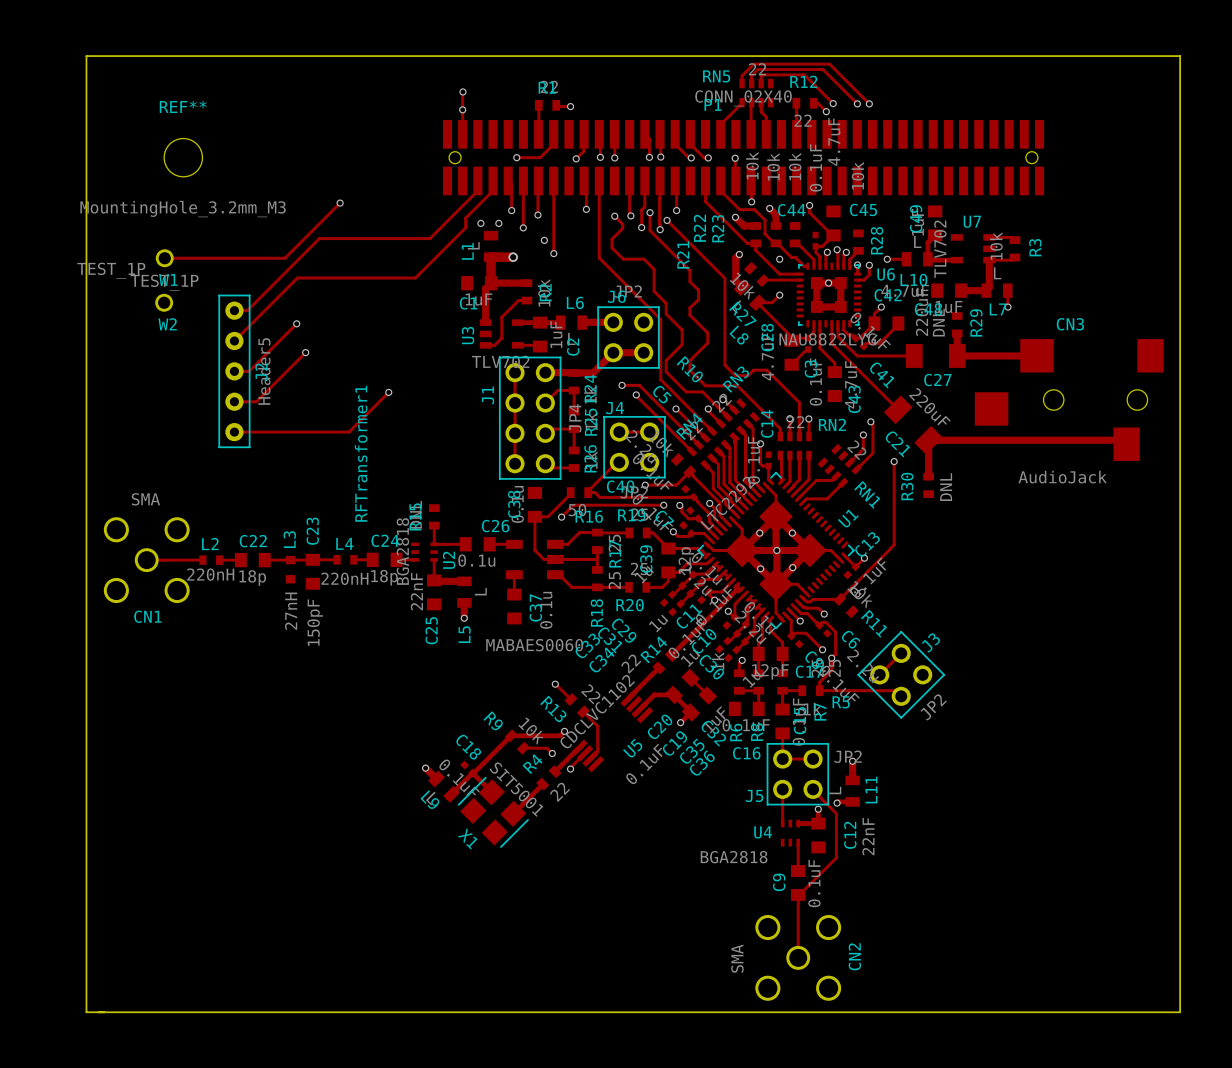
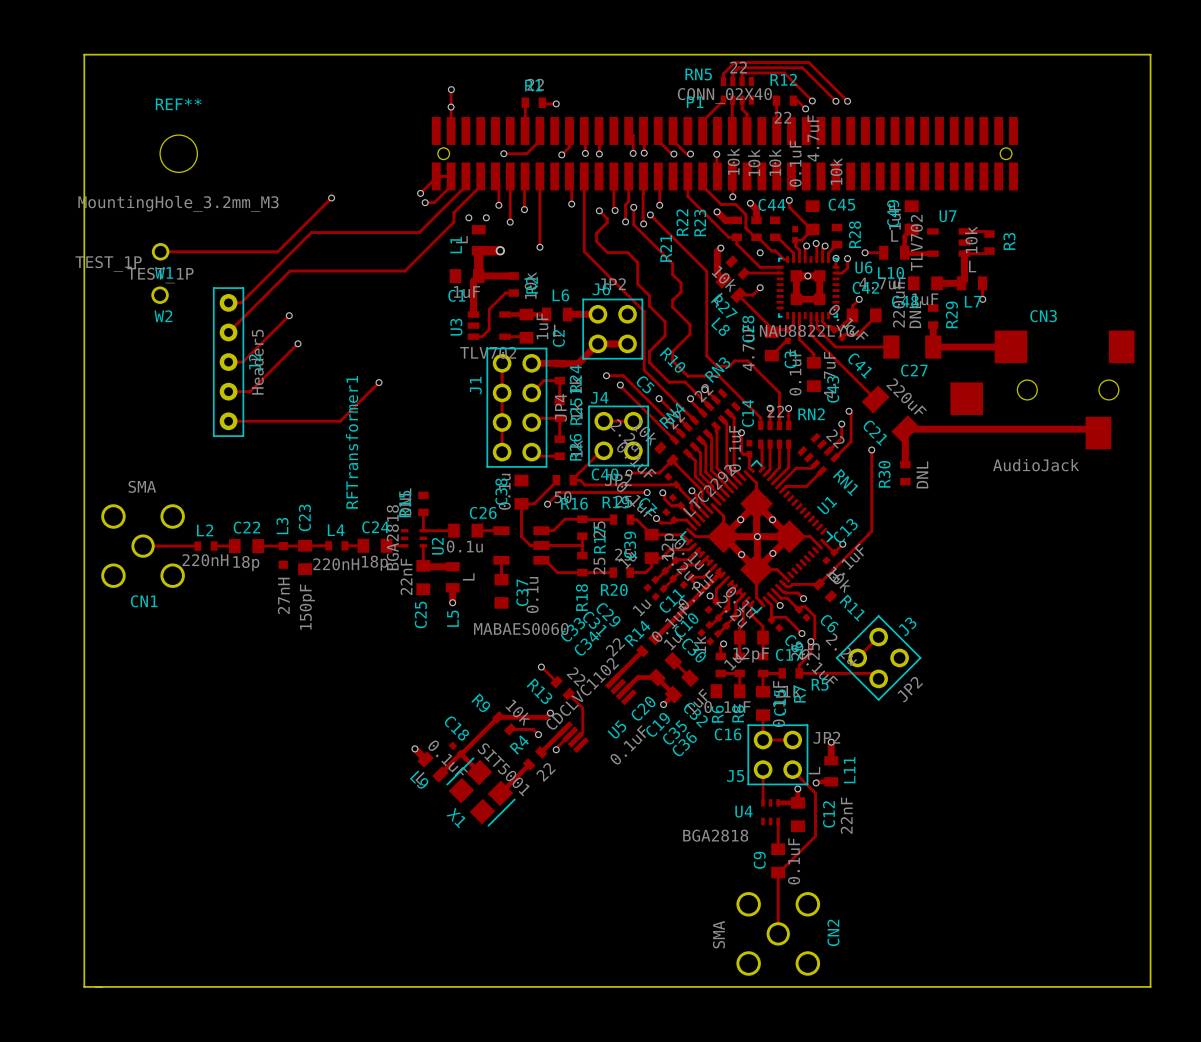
track: none -> (436, 176) (451, 176)
track: none -> (436, 177) (420, 193)
track: none -> (451, 186) (434, 202) (425, 202)
via: none -> (420, 193)
via: none -> (425, 202)
via: (544, 240) -> none

